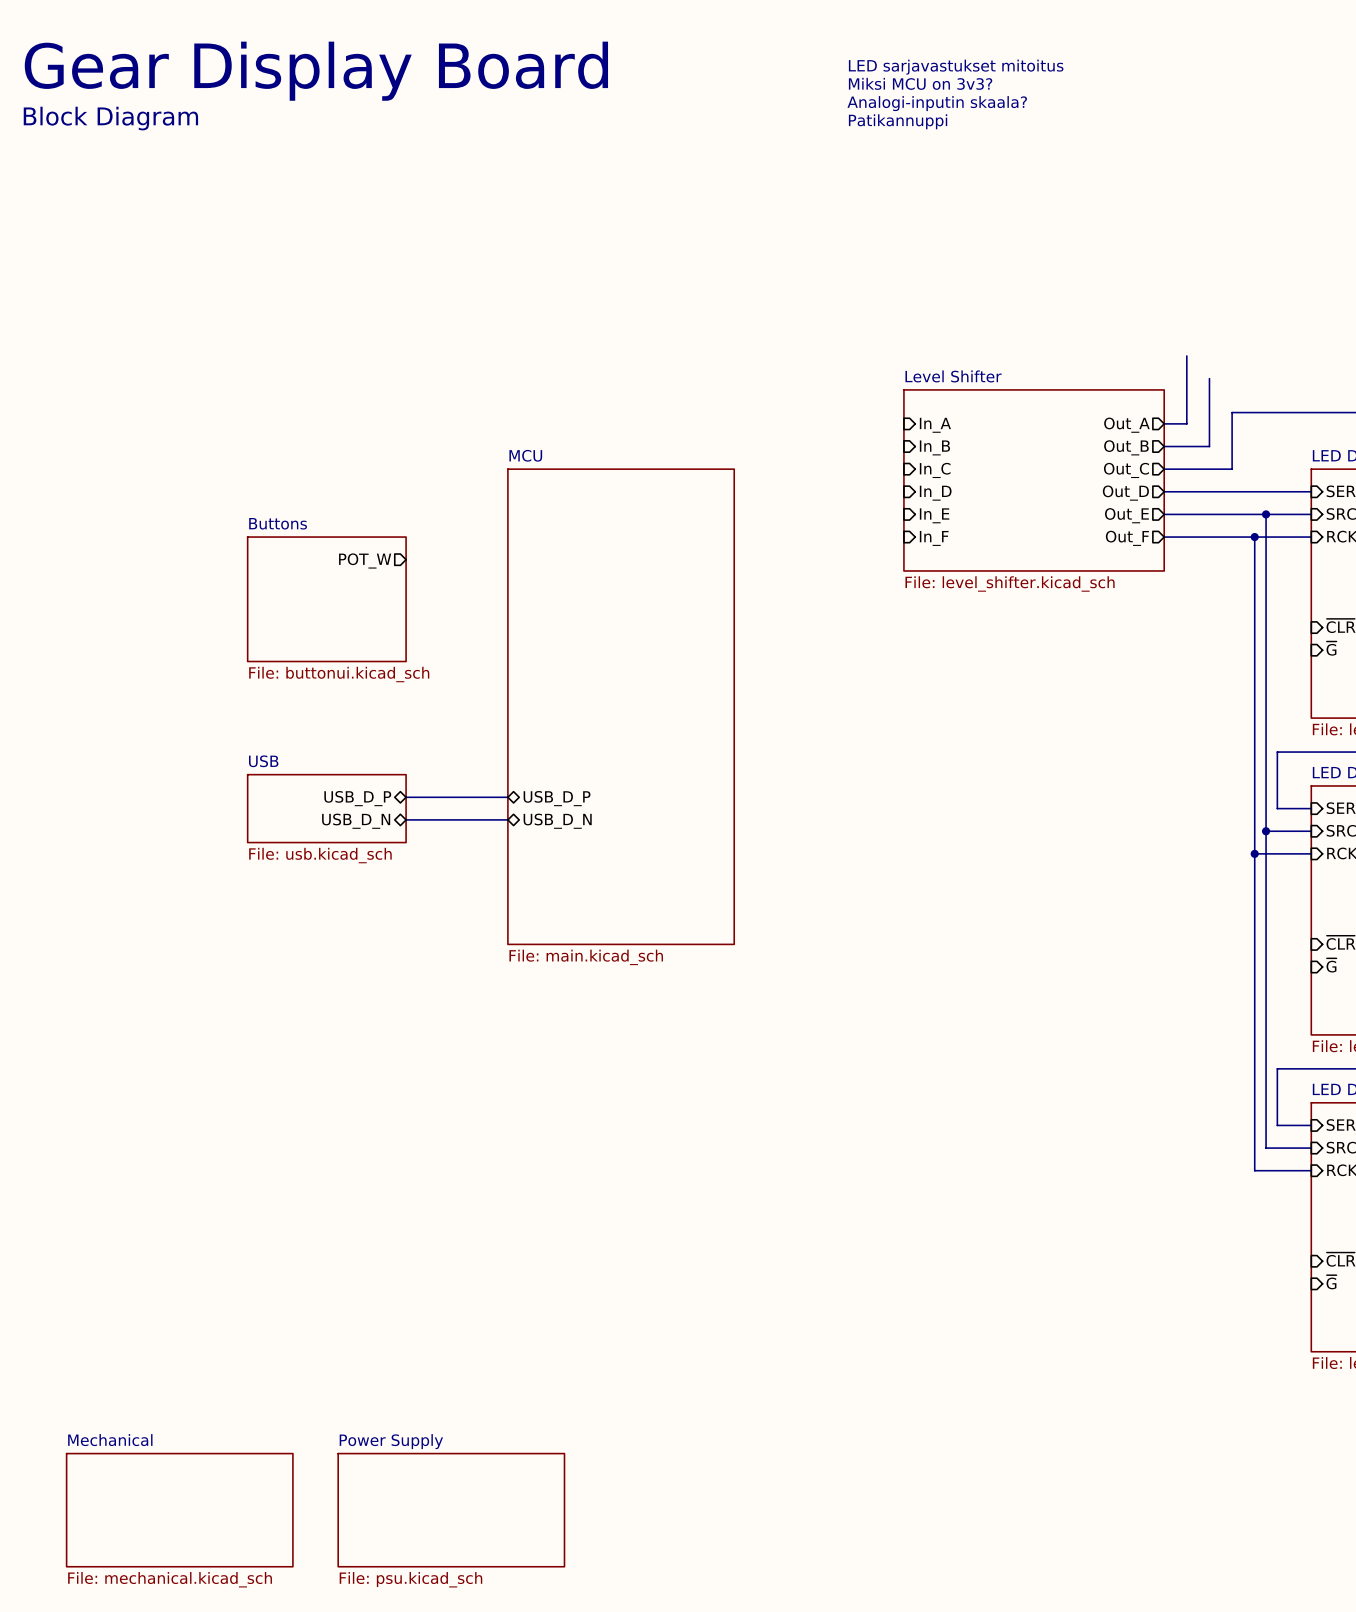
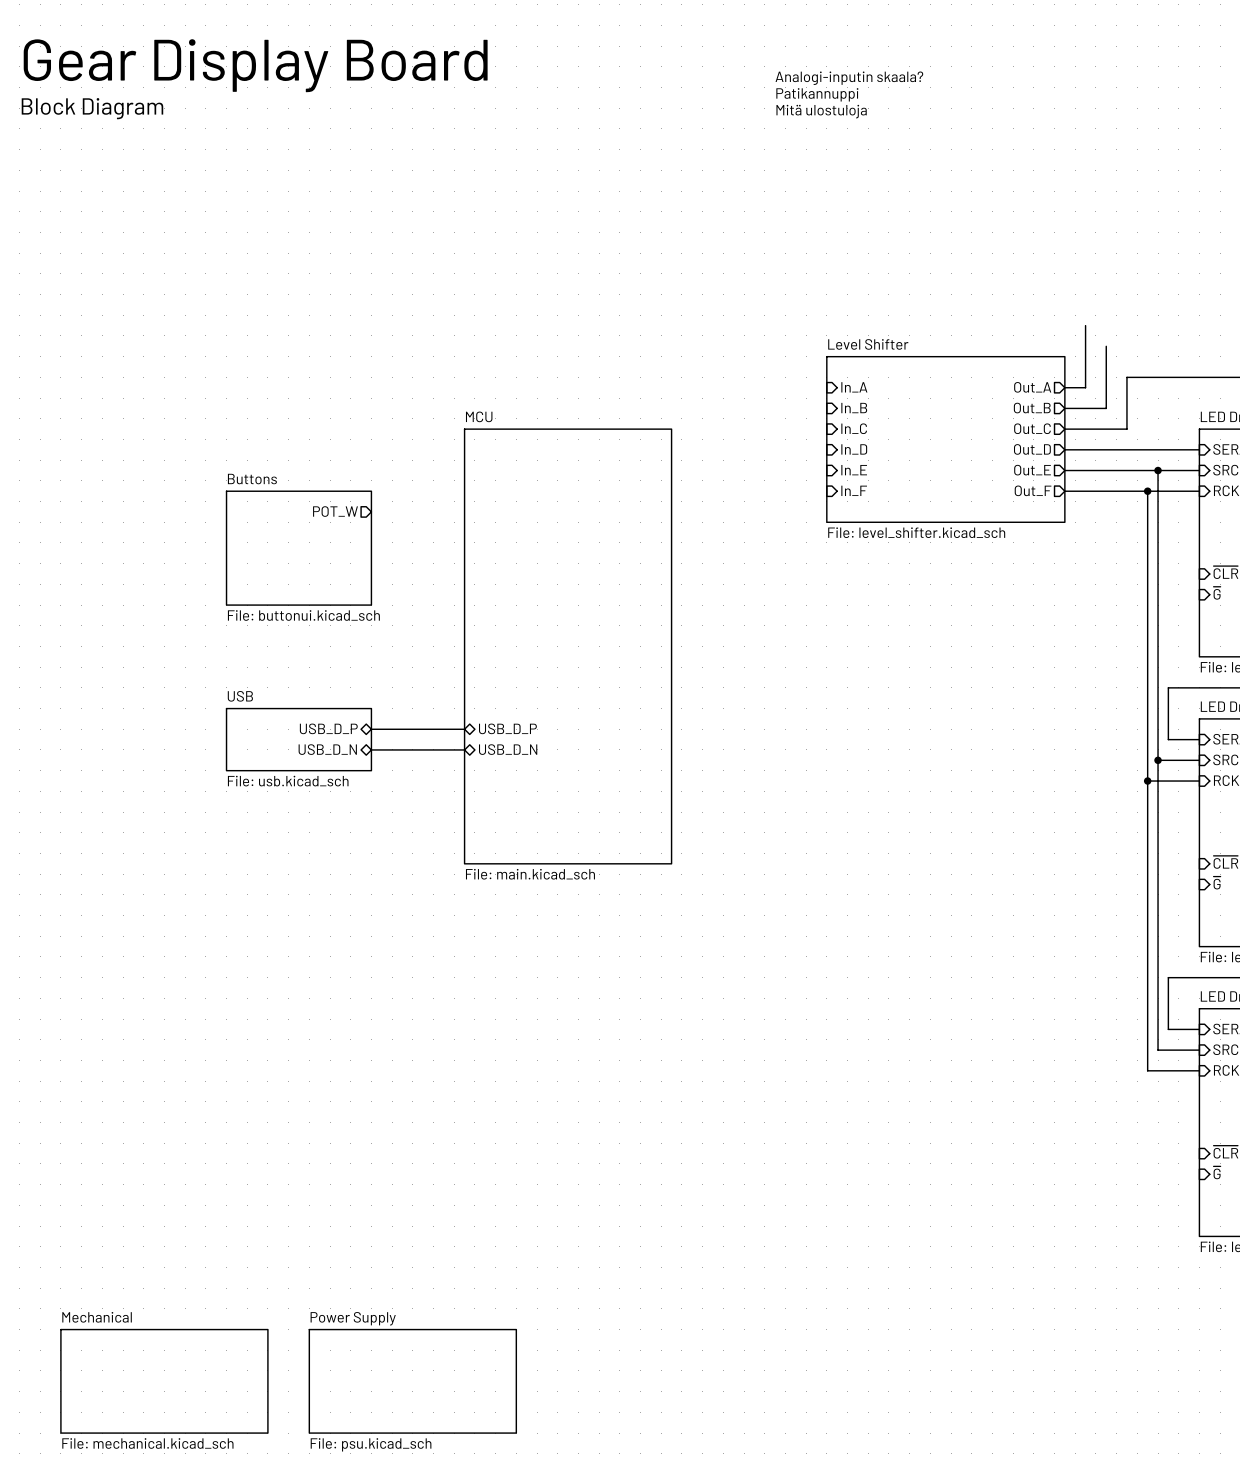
text: LED sarjavastukset mitoitus (956, 67) -> none
text: Miksi MCU on 3v3? (920, 83) -> Analogi-inputin skaala? (849, 78)
text: Analogi-inputin skaala? (937, 103) -> Patikannuppi (817, 94)
text: Patikannuppi (898, 121) -> Mitä ulostuloja (821, 111)

